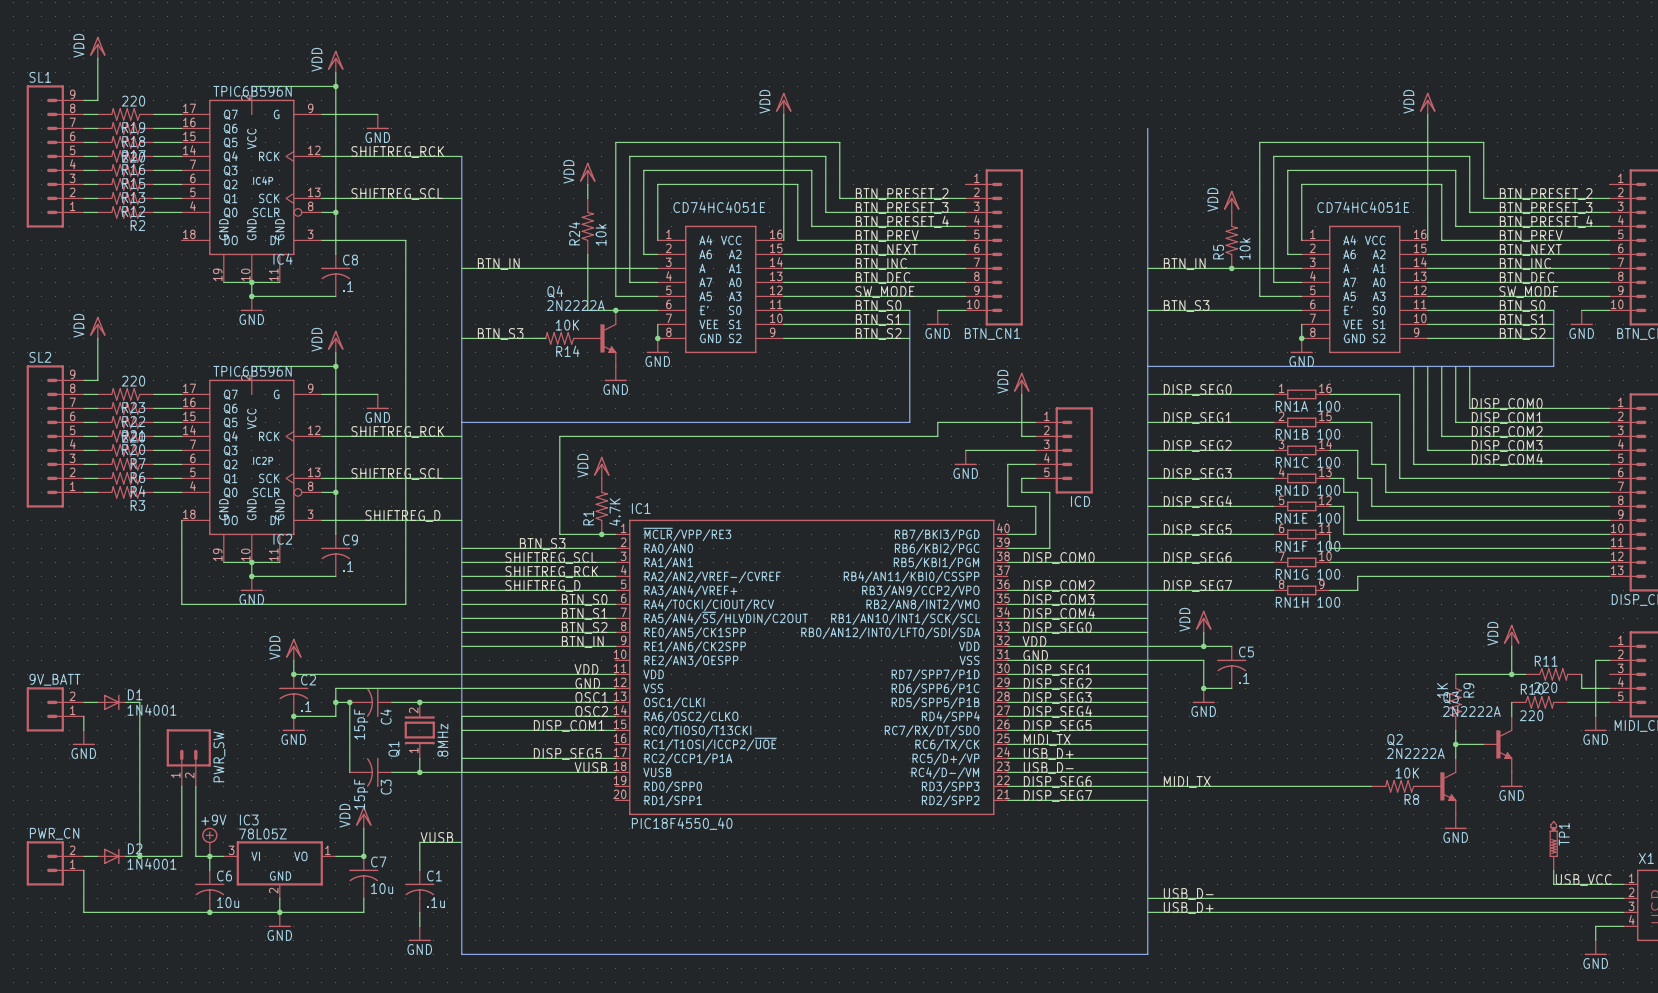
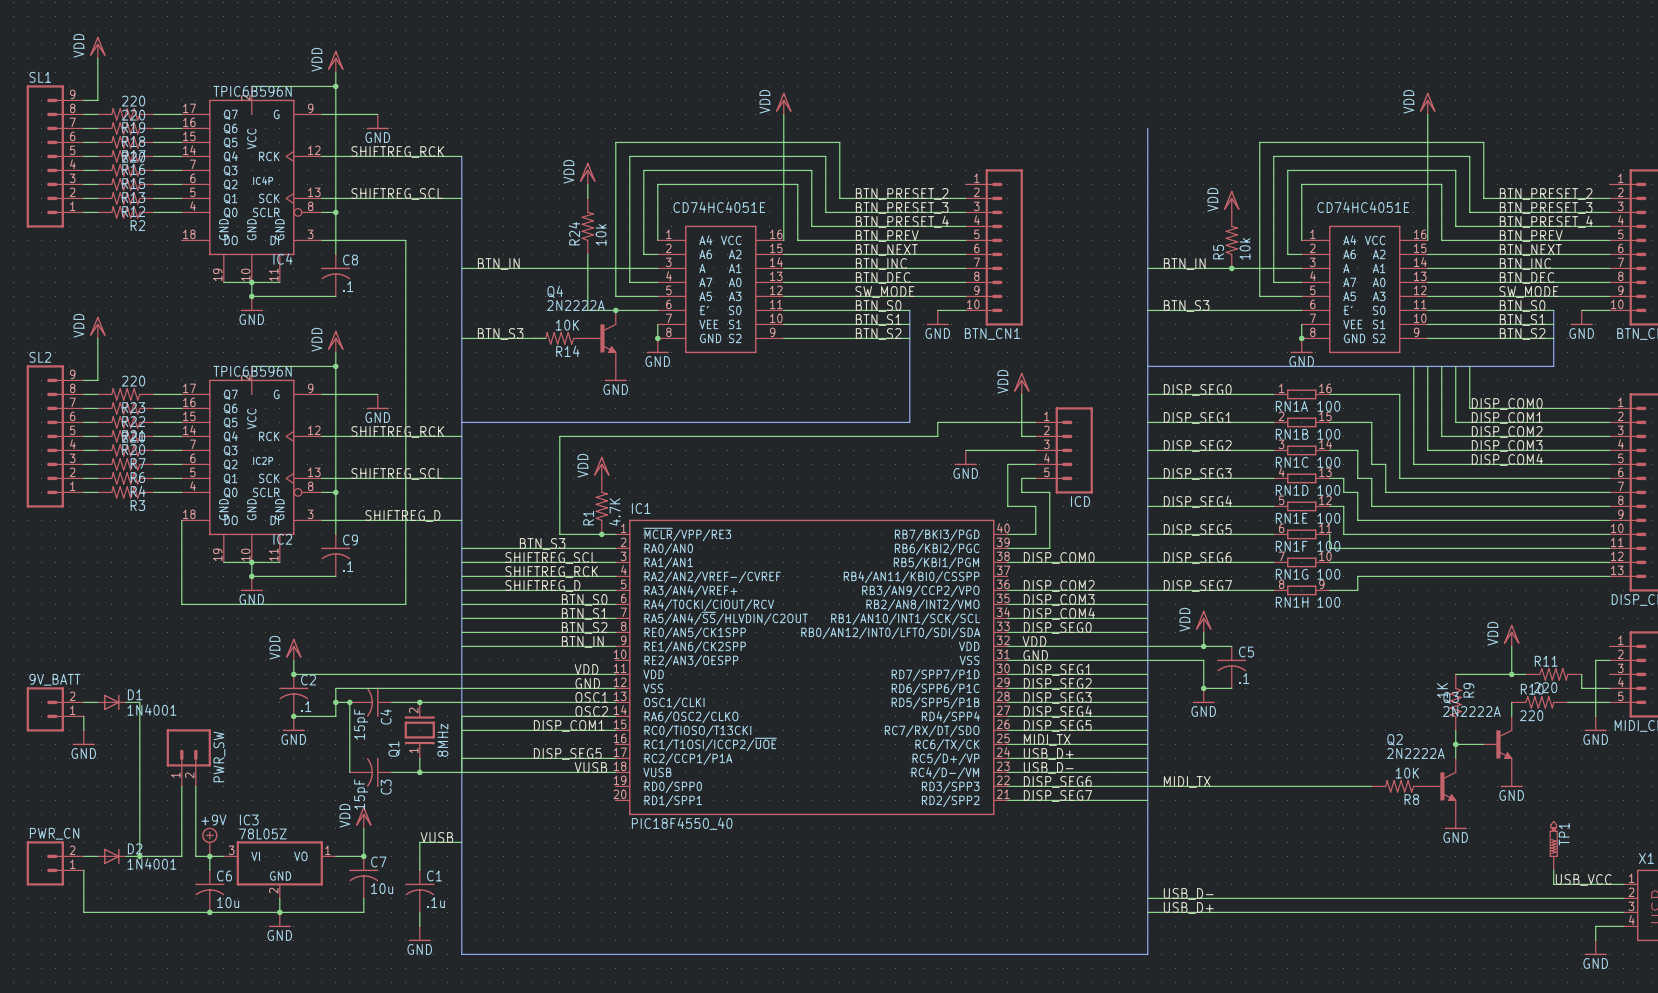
R18 value: none -> 220 (133, 115)

